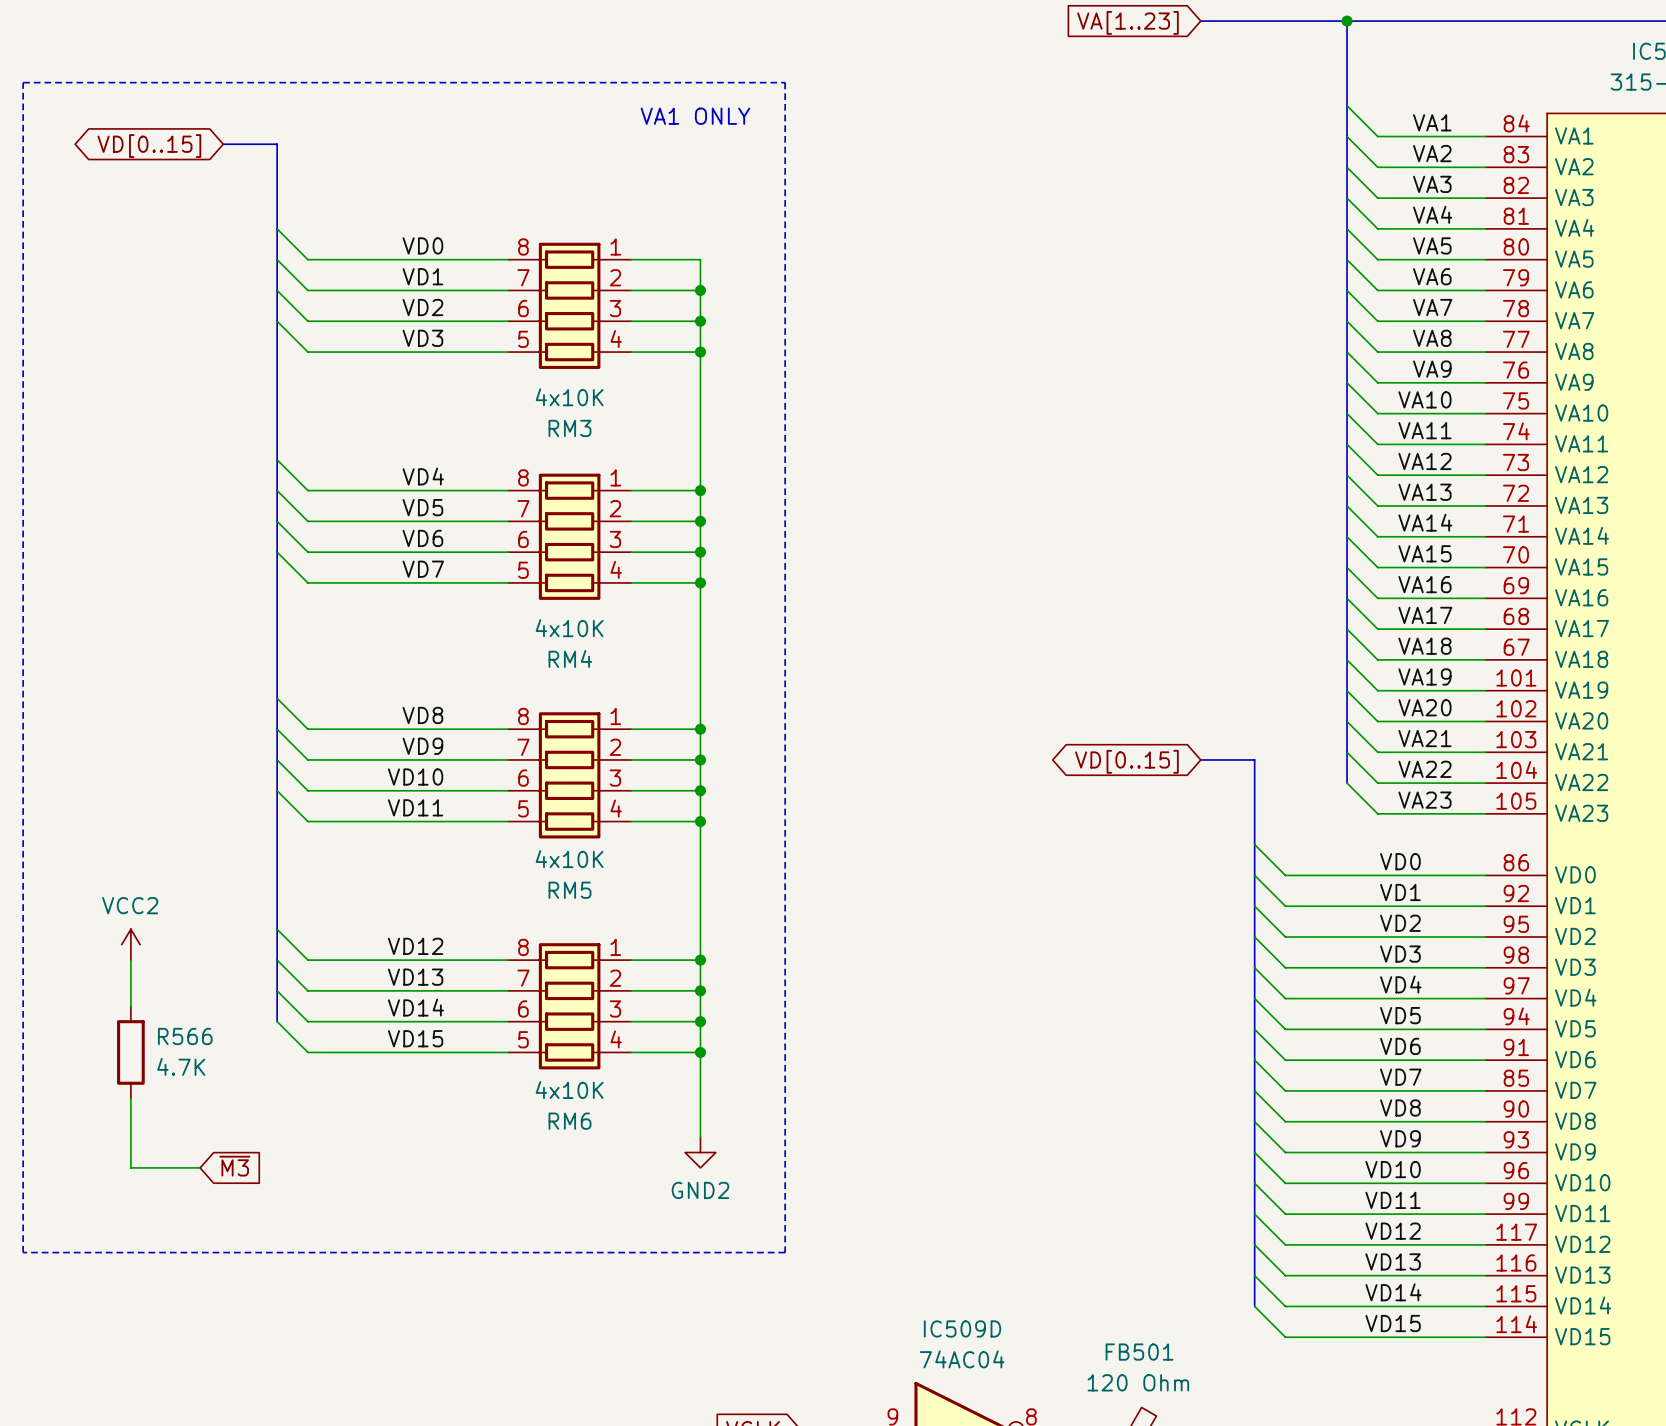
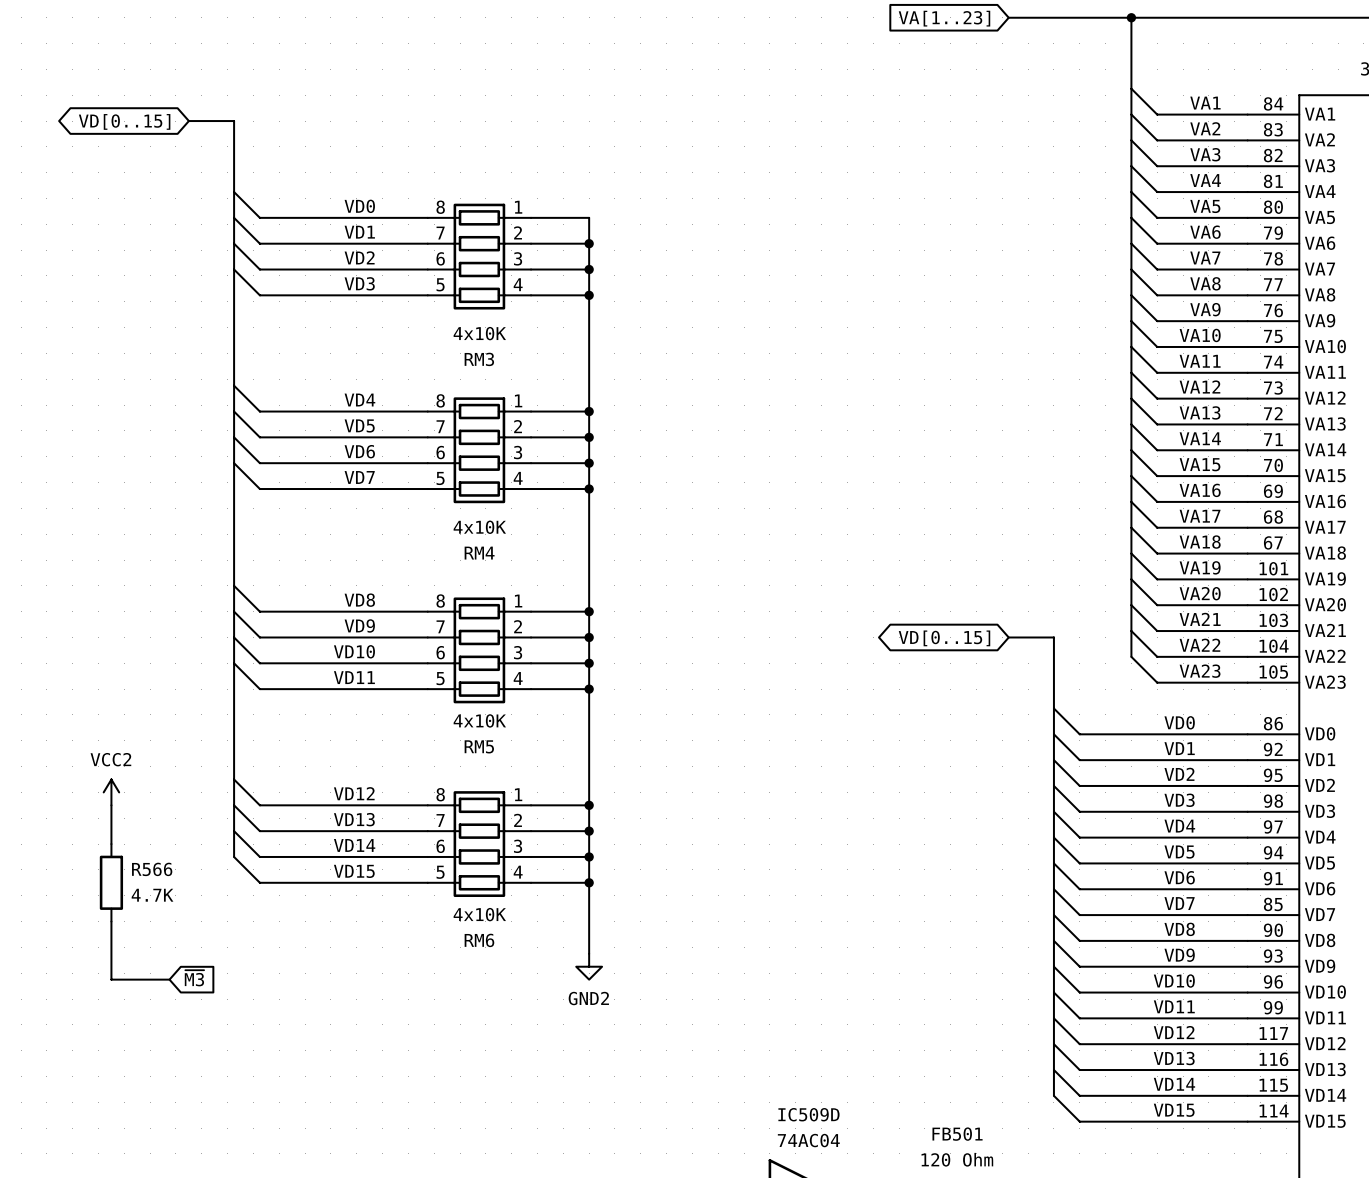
line: (23, 82) (785, 82) (785, 1252) (23, 1252) (23, 82) -> none
text: VA1 ONLY (695, 116) -> none

